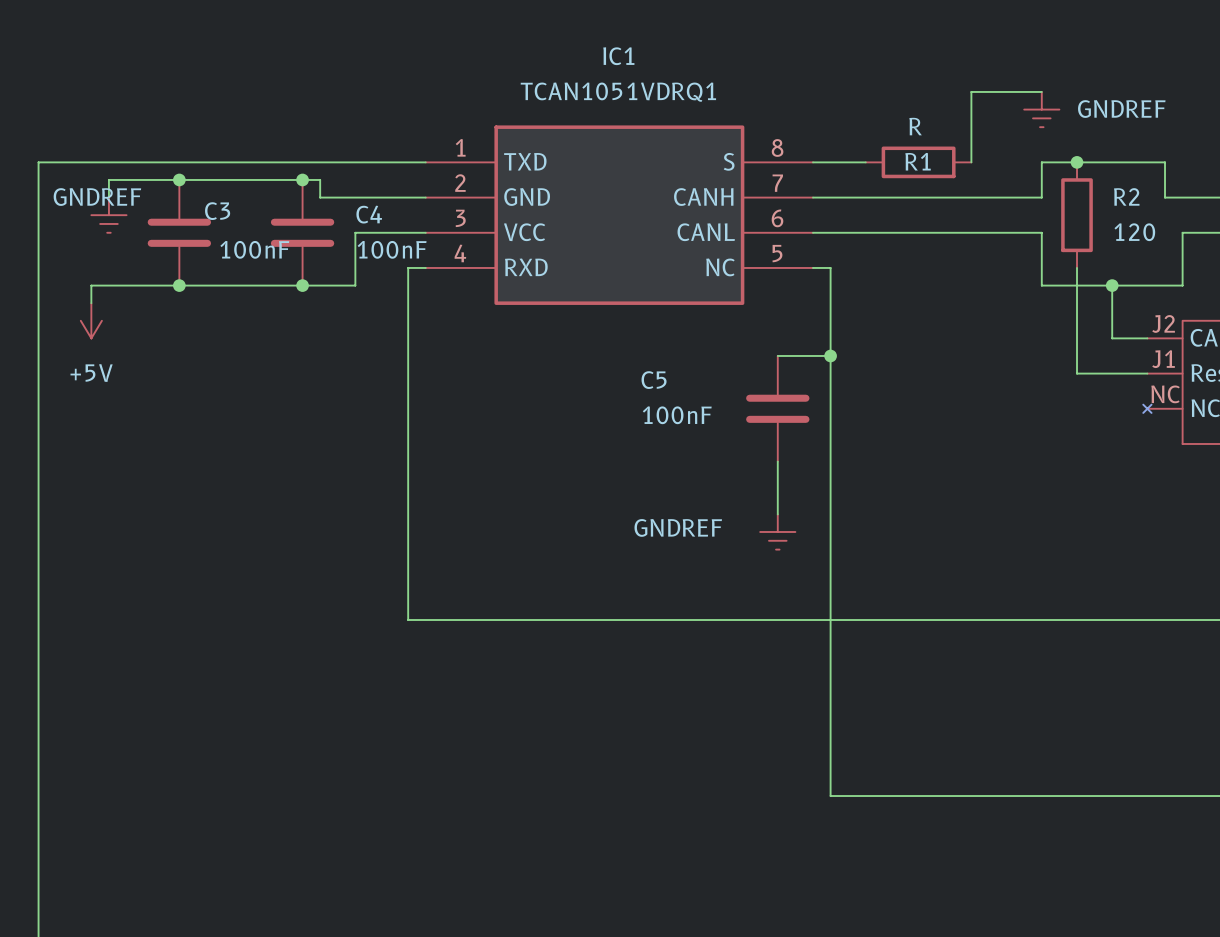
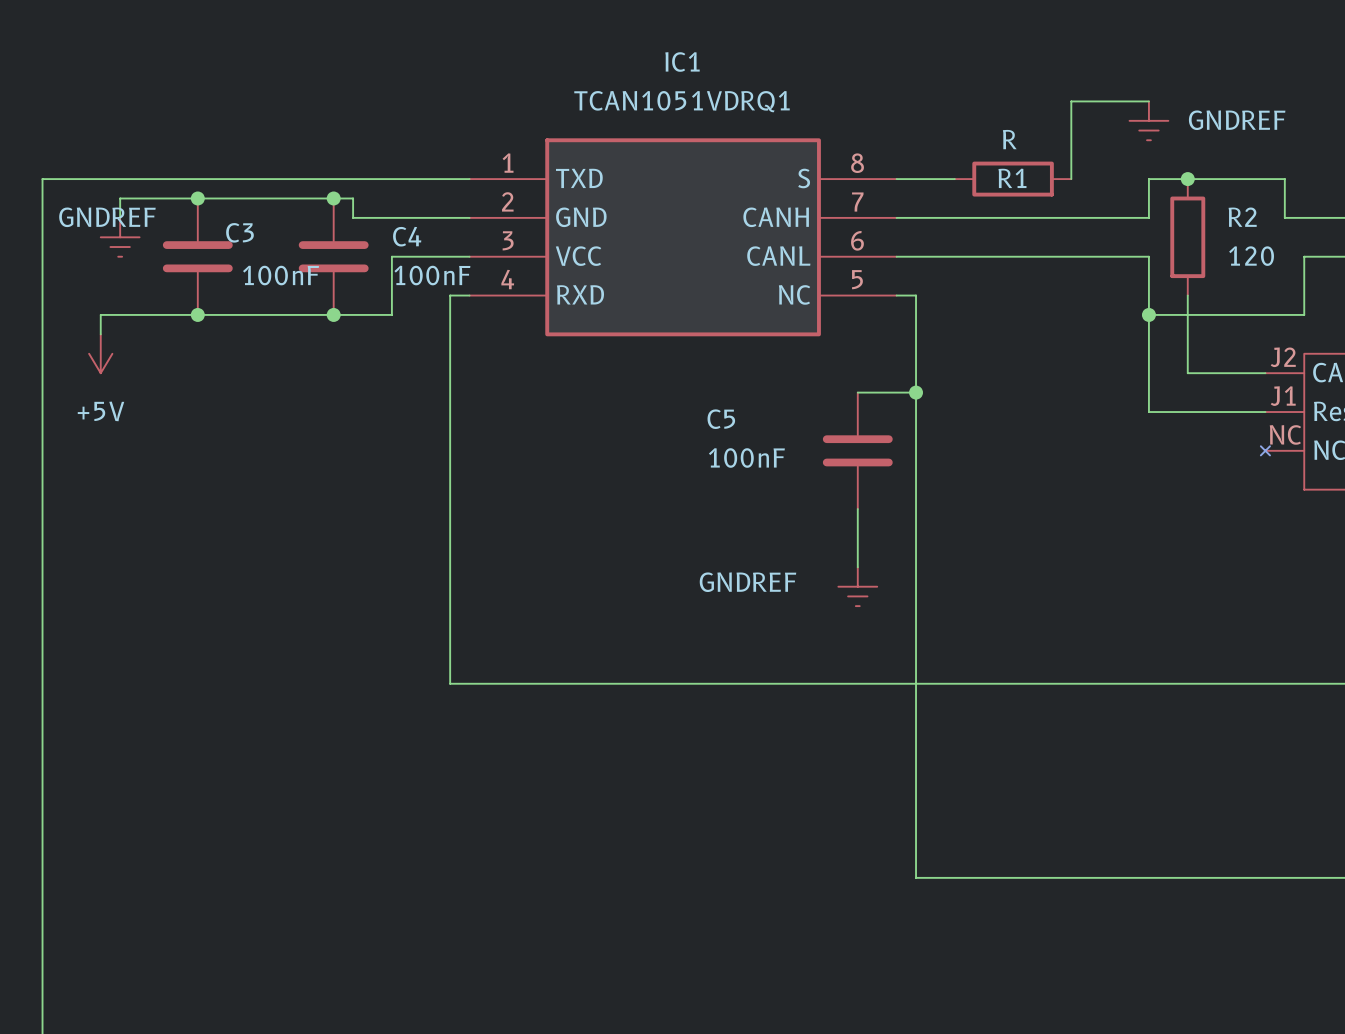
wire: none -> (1148, 314) (1148, 412) (1187, 412)
wire: (1112, 285) (1112, 338) -> none
junction position: (1112, 285) -> (1148, 314)
wire: (1077, 338) (1077, 373) -> (1187, 373) (1226, 373)

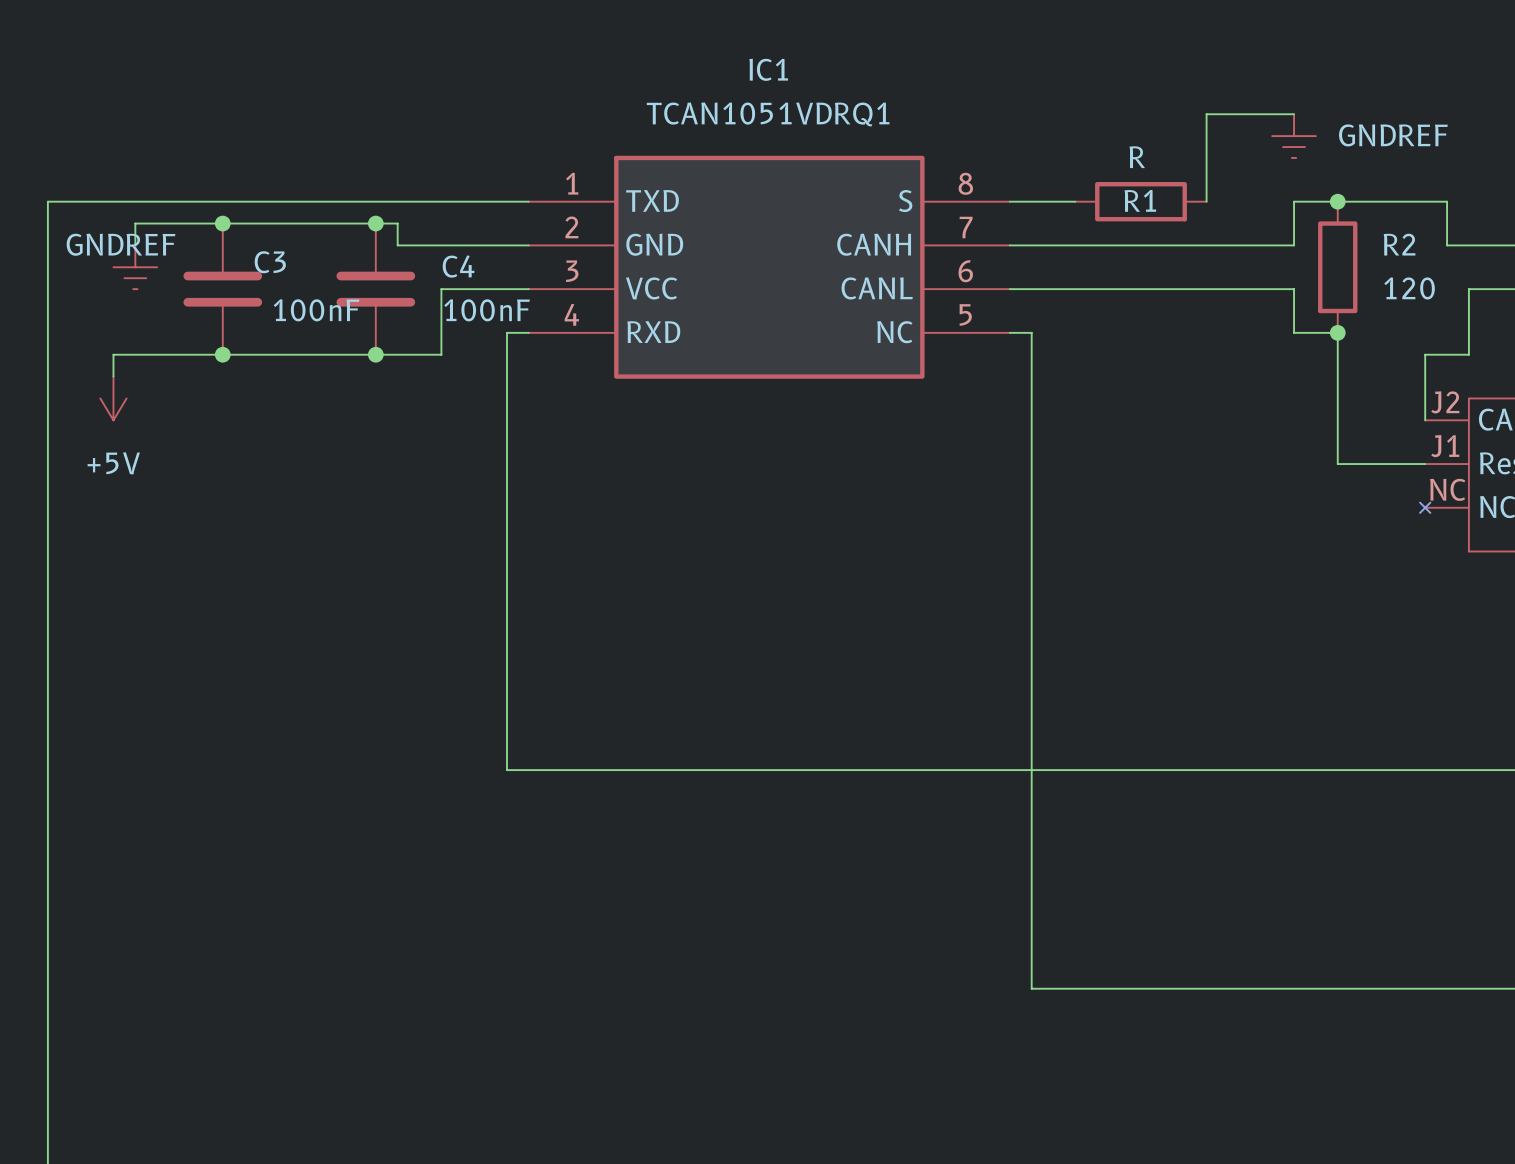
wire: (1148, 295) (1148, 412) (1187, 412) -> (1337, 420) (1337, 464)
wire: none -> (1294, 332) (1337, 332)
wire: (1148, 314) (1265, 314) -> none
junction position: (1148, 314) -> (1337, 332)
wire: (1187, 373) (1265, 373) -> (1425, 354) (1425, 420)
wire: (857, 392) (916, 392) -> none
junction: (916, 392) -> none
C5: 100nF (857, 450) -> none
wire: (857, 509) (857, 567) -> none
power symbol: GNDREF (857, 586) -> none

